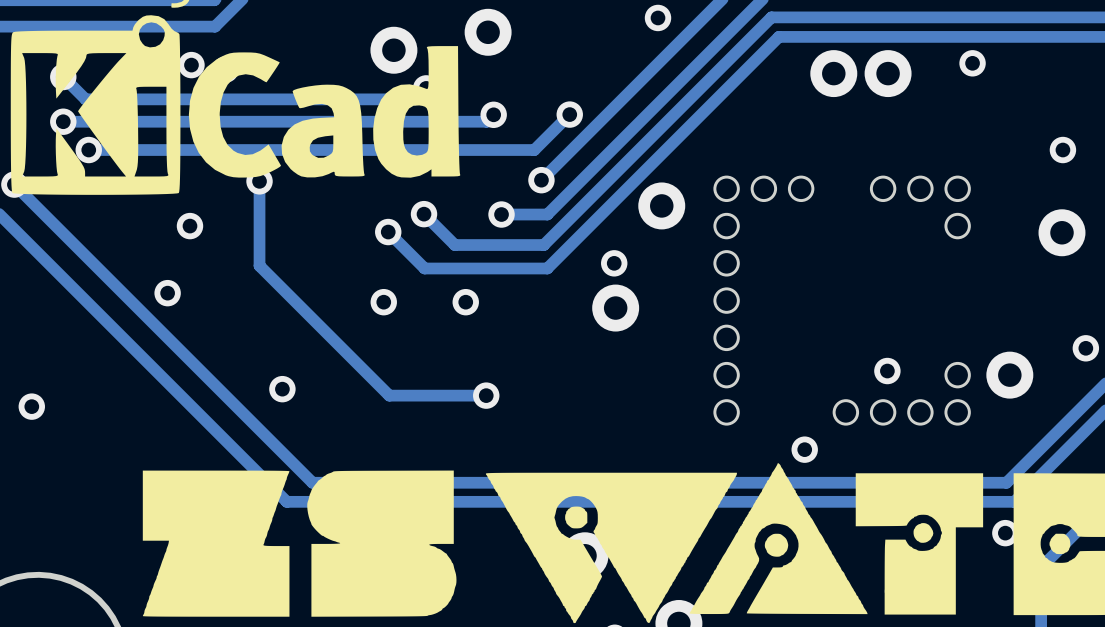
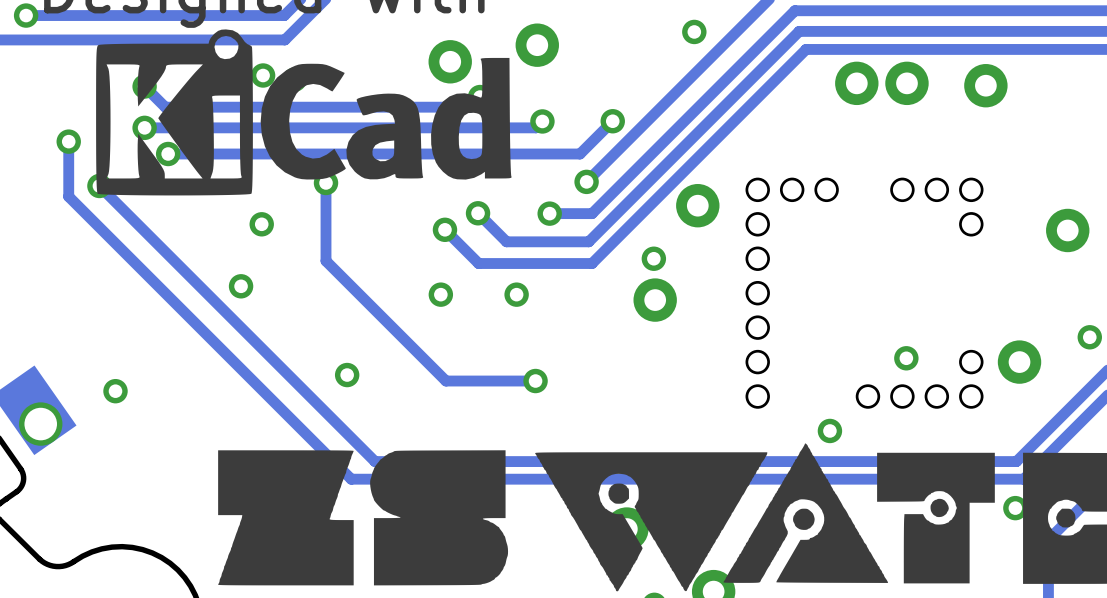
via size: [959, 50, 986, 77] -> [964, 64, 1008, 108]
via: (1062, 150) -> none

